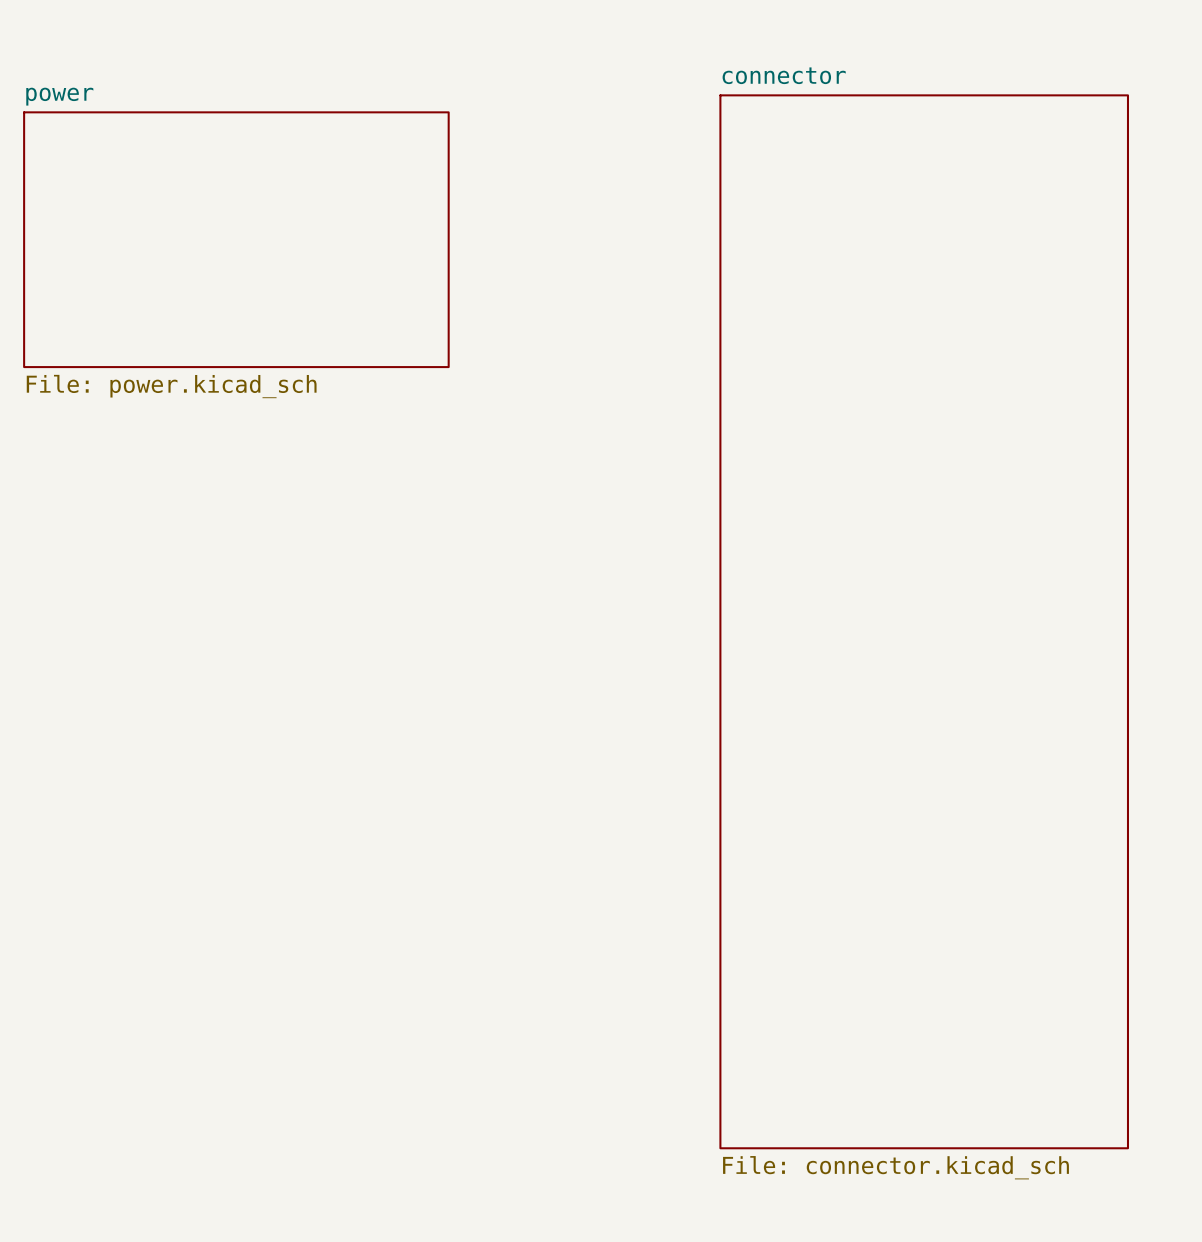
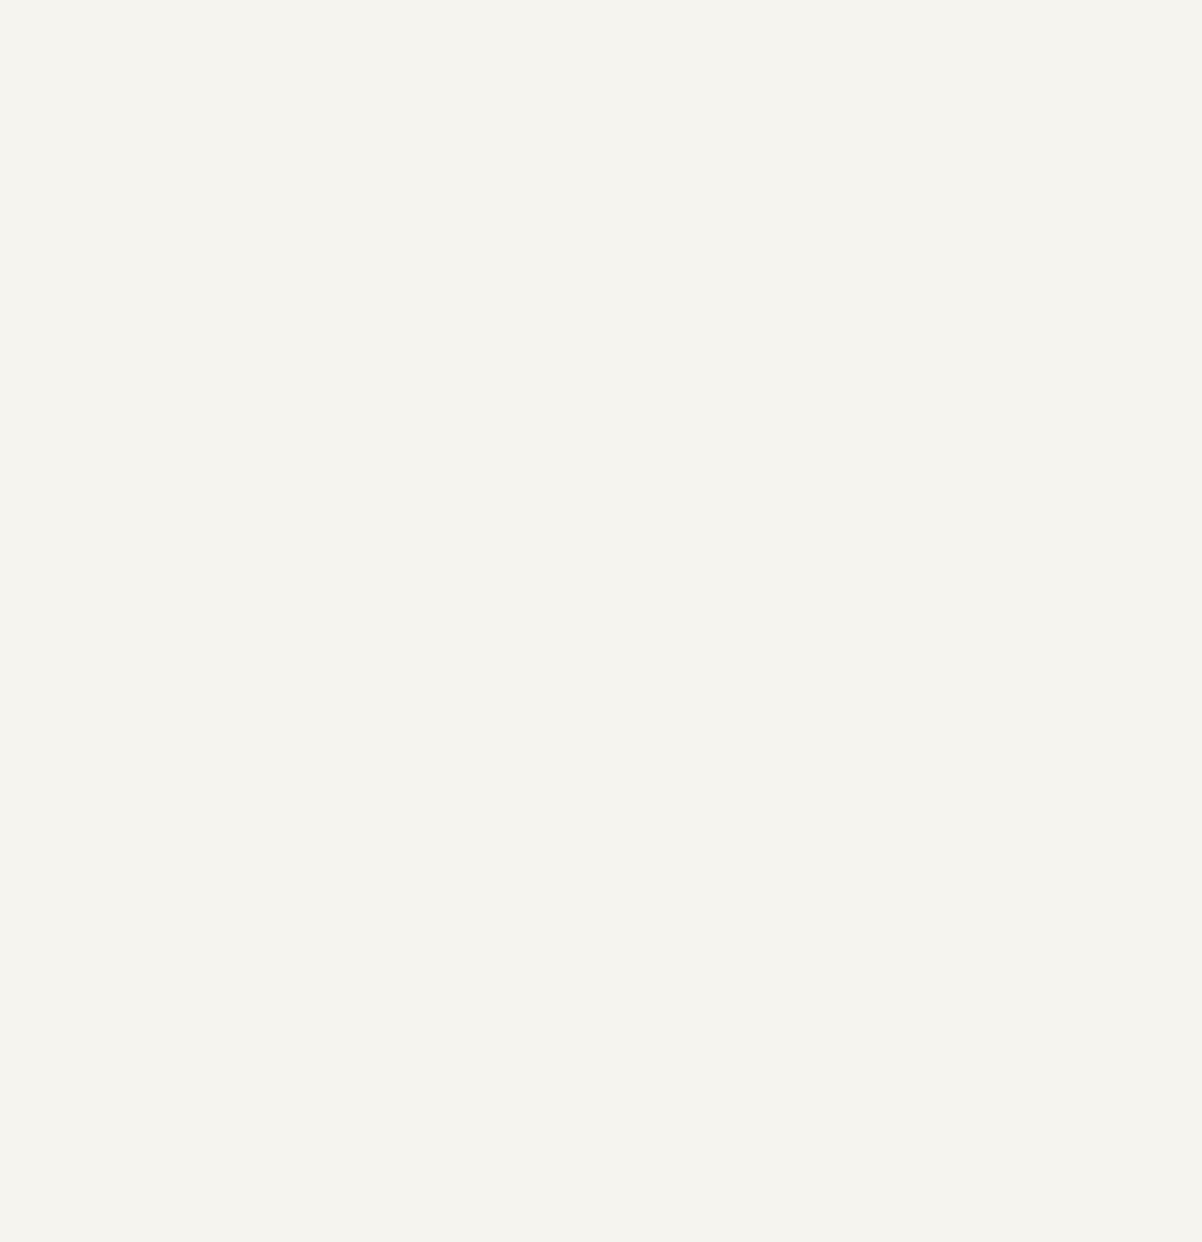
sheet power: File: power.kicad_sch (236, 239) -> none
sheet connector: File: connector.kicad_sch (924, 621) -> none

